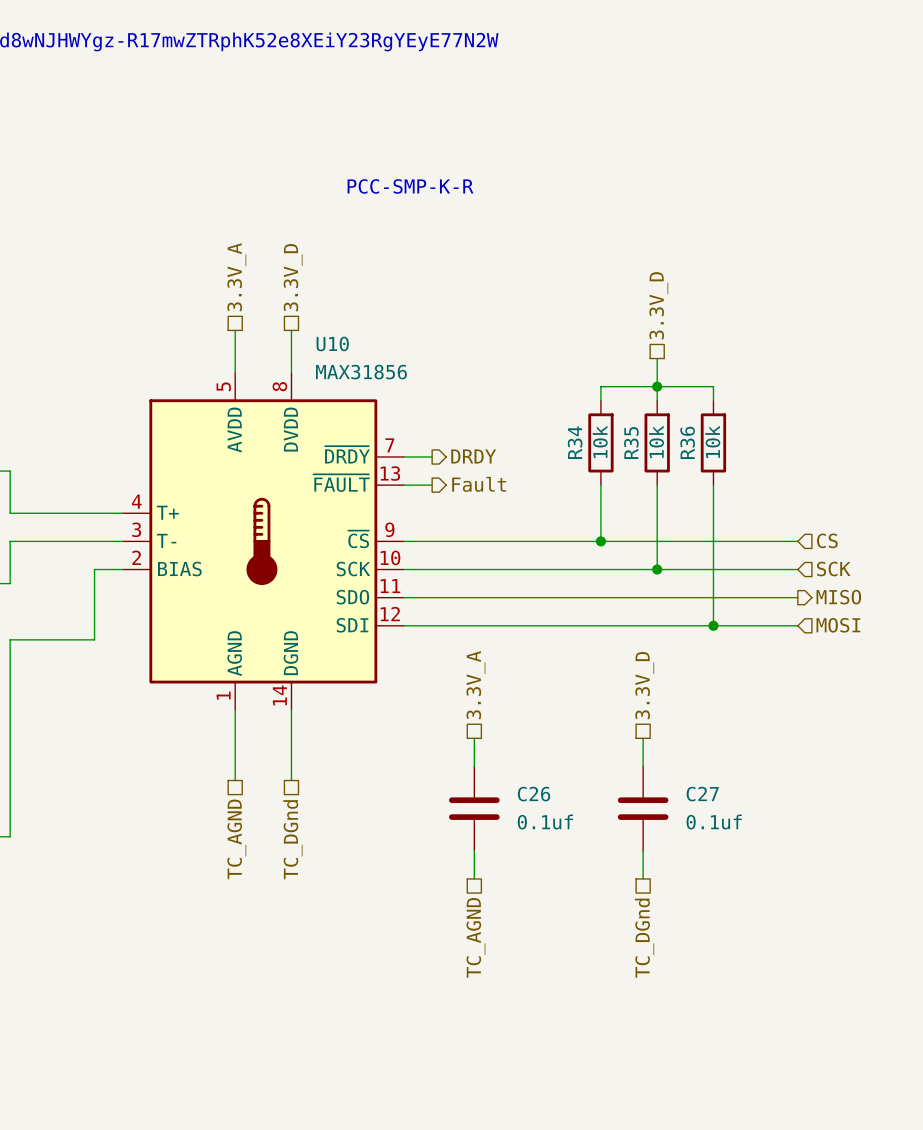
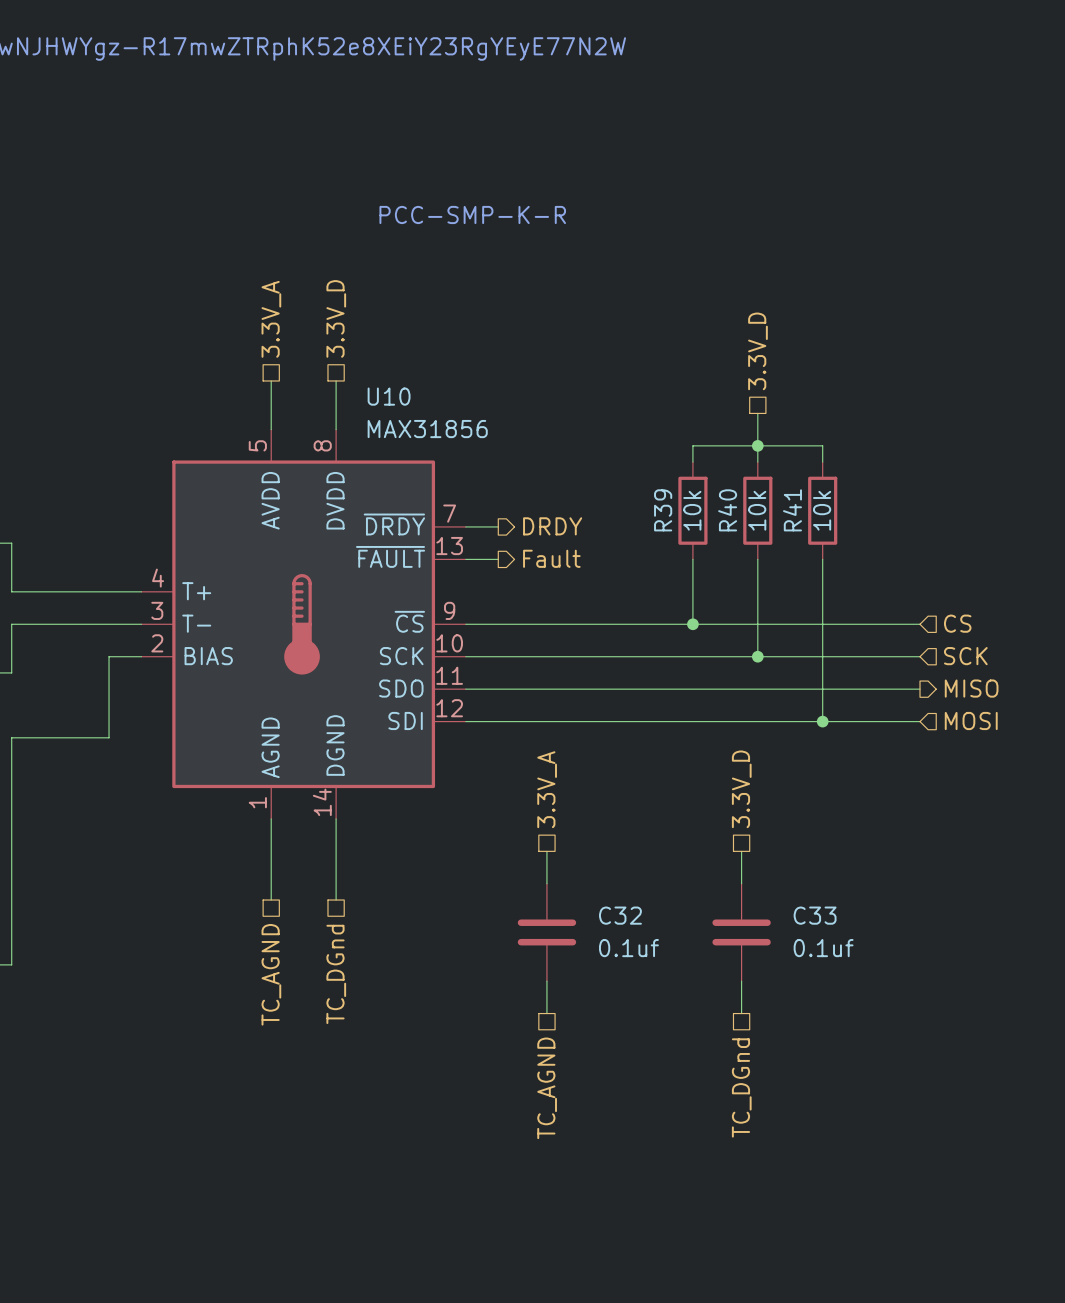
R34 name: R34 (575, 442) -> R39 (663, 510)
R36 name: R36 (687, 442) -> R41 (792, 510)
R35 name: R35 (631, 443) -> R40 (727, 510)
C26 name: C26 (533, 794) -> C32 (620, 915)
C27 name: C27 (702, 794) -> C33 (815, 915)

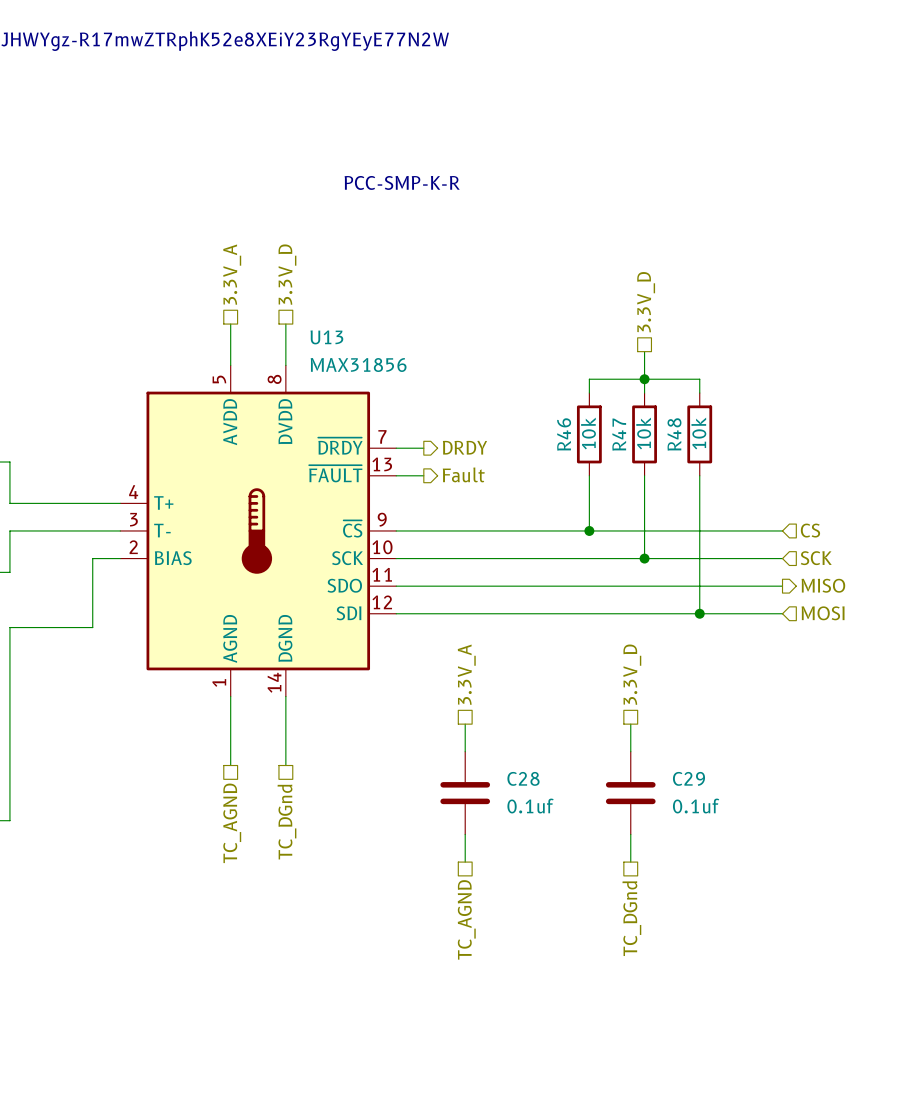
U10 name: U10 (389, 396) -> U13 (326, 337)
R39 name: R39 (663, 510) -> R46 (564, 434)
R40 name: R40 (727, 510) -> R47 (619, 434)
R41 name: R41 (792, 510) -> R48 (674, 434)
C32 name: C32 (620, 915) -> C28 (523, 778)
C33 name: C33 (815, 915) -> C29 (688, 778)

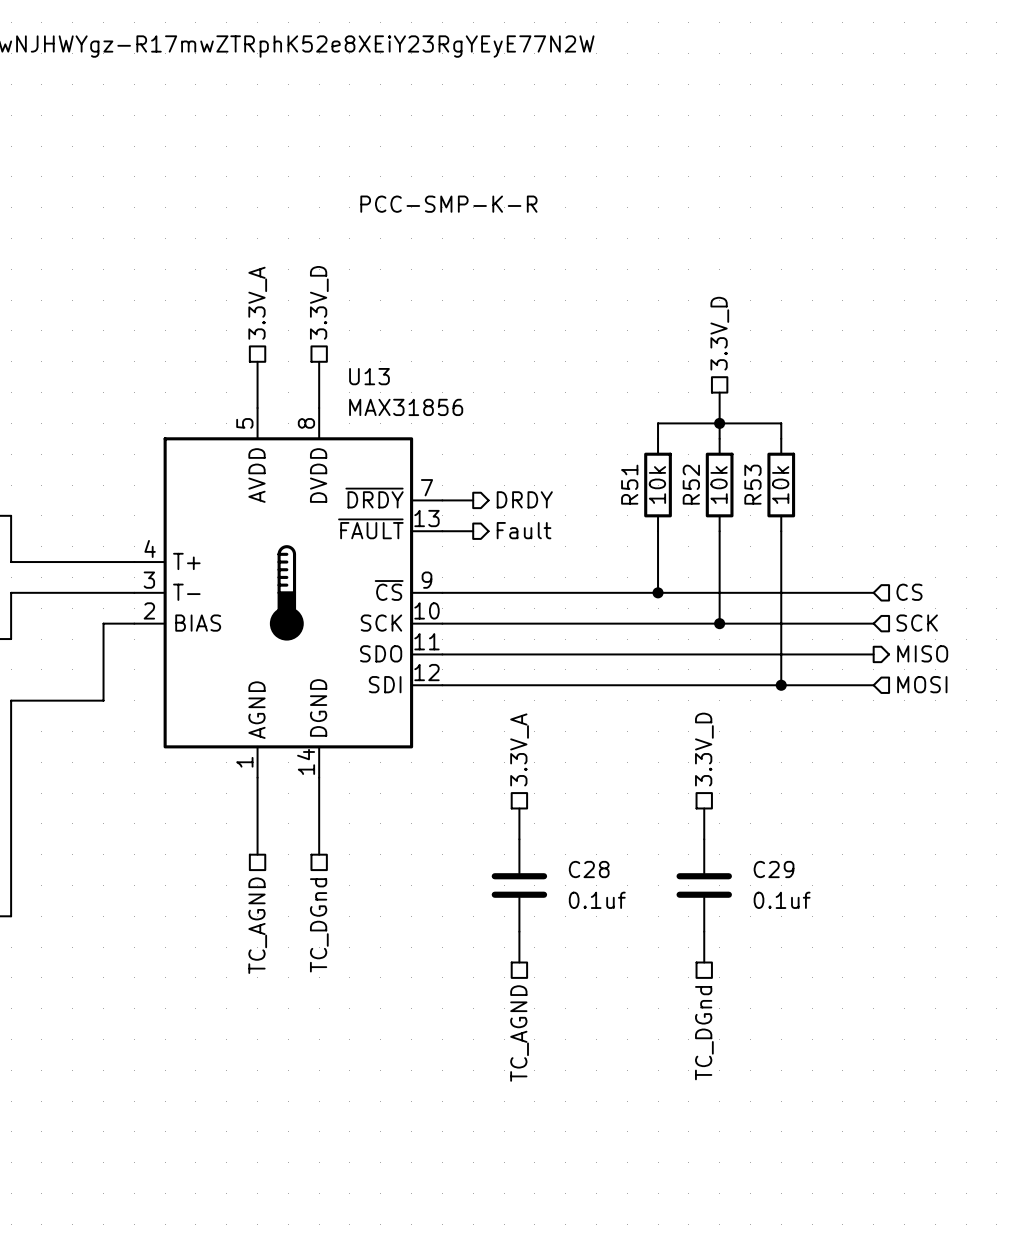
R46 name: R46 (564, 434) -> R51 (629, 484)
R47 name: R47 (619, 434) -> R52 (691, 484)
R48 name: R48 (674, 434) -> R53 (752, 484)

